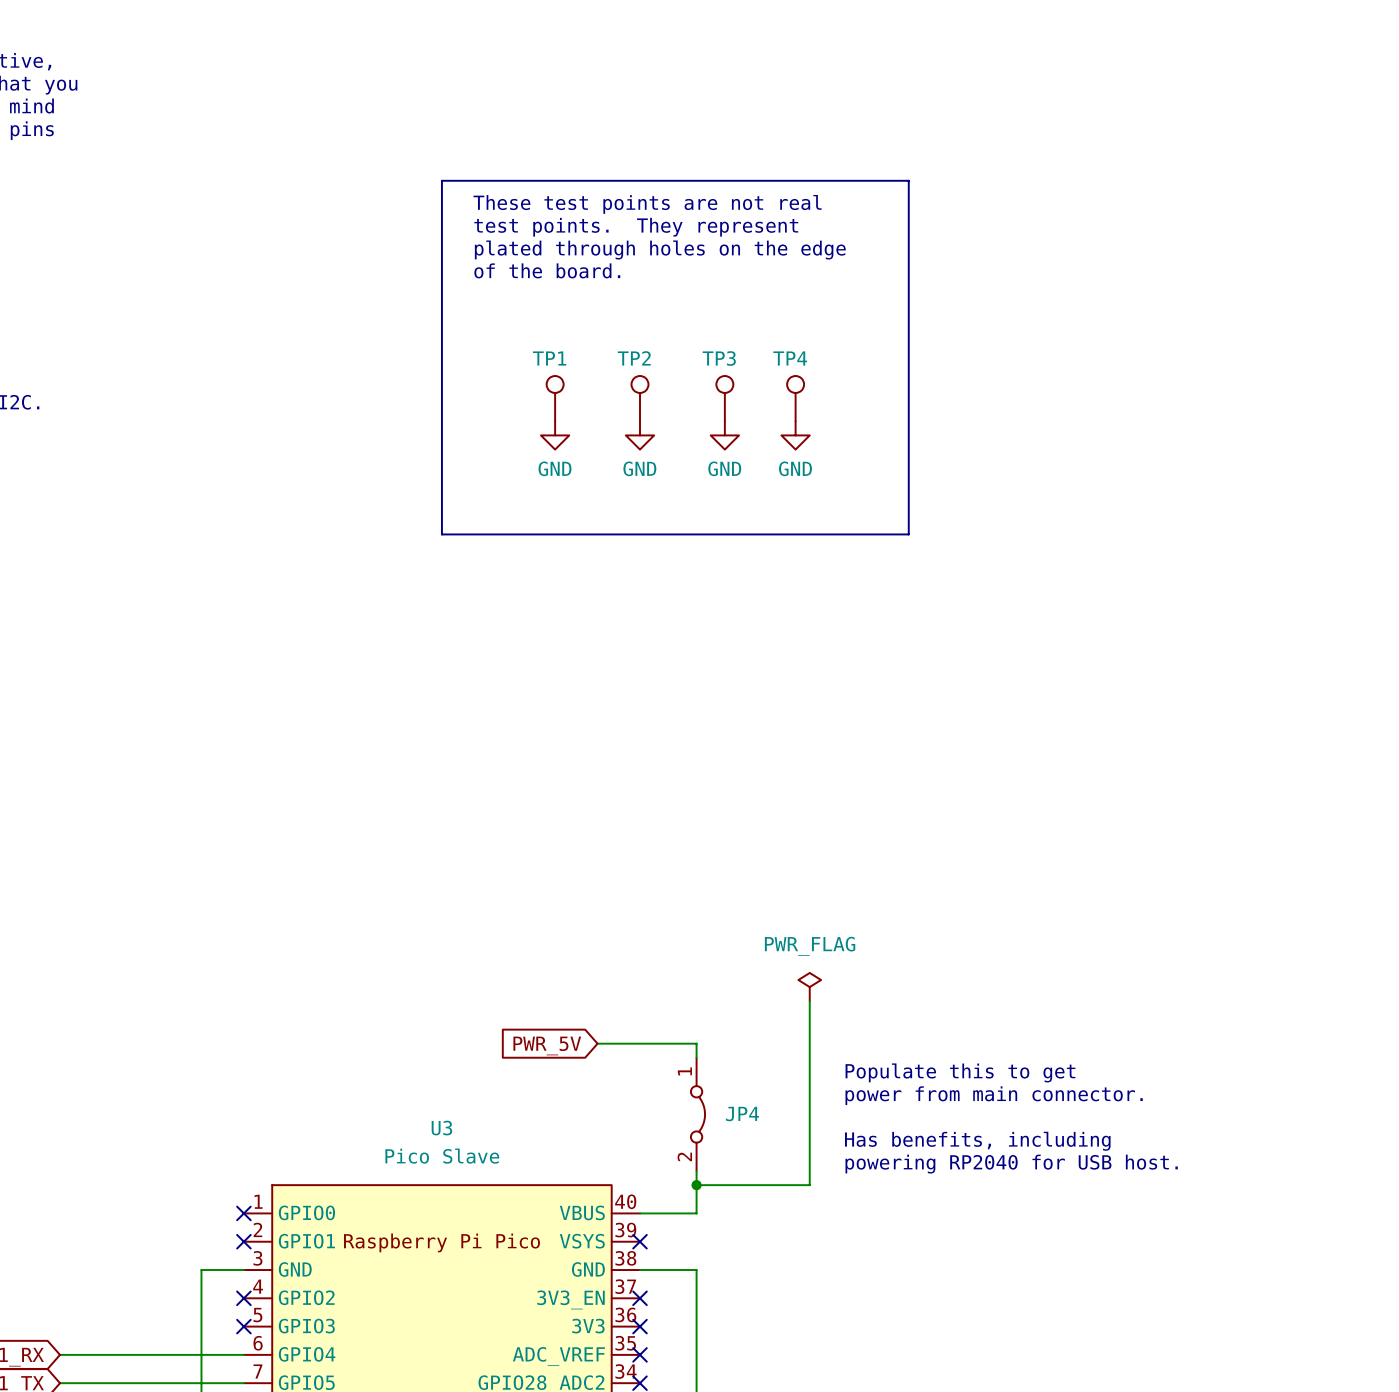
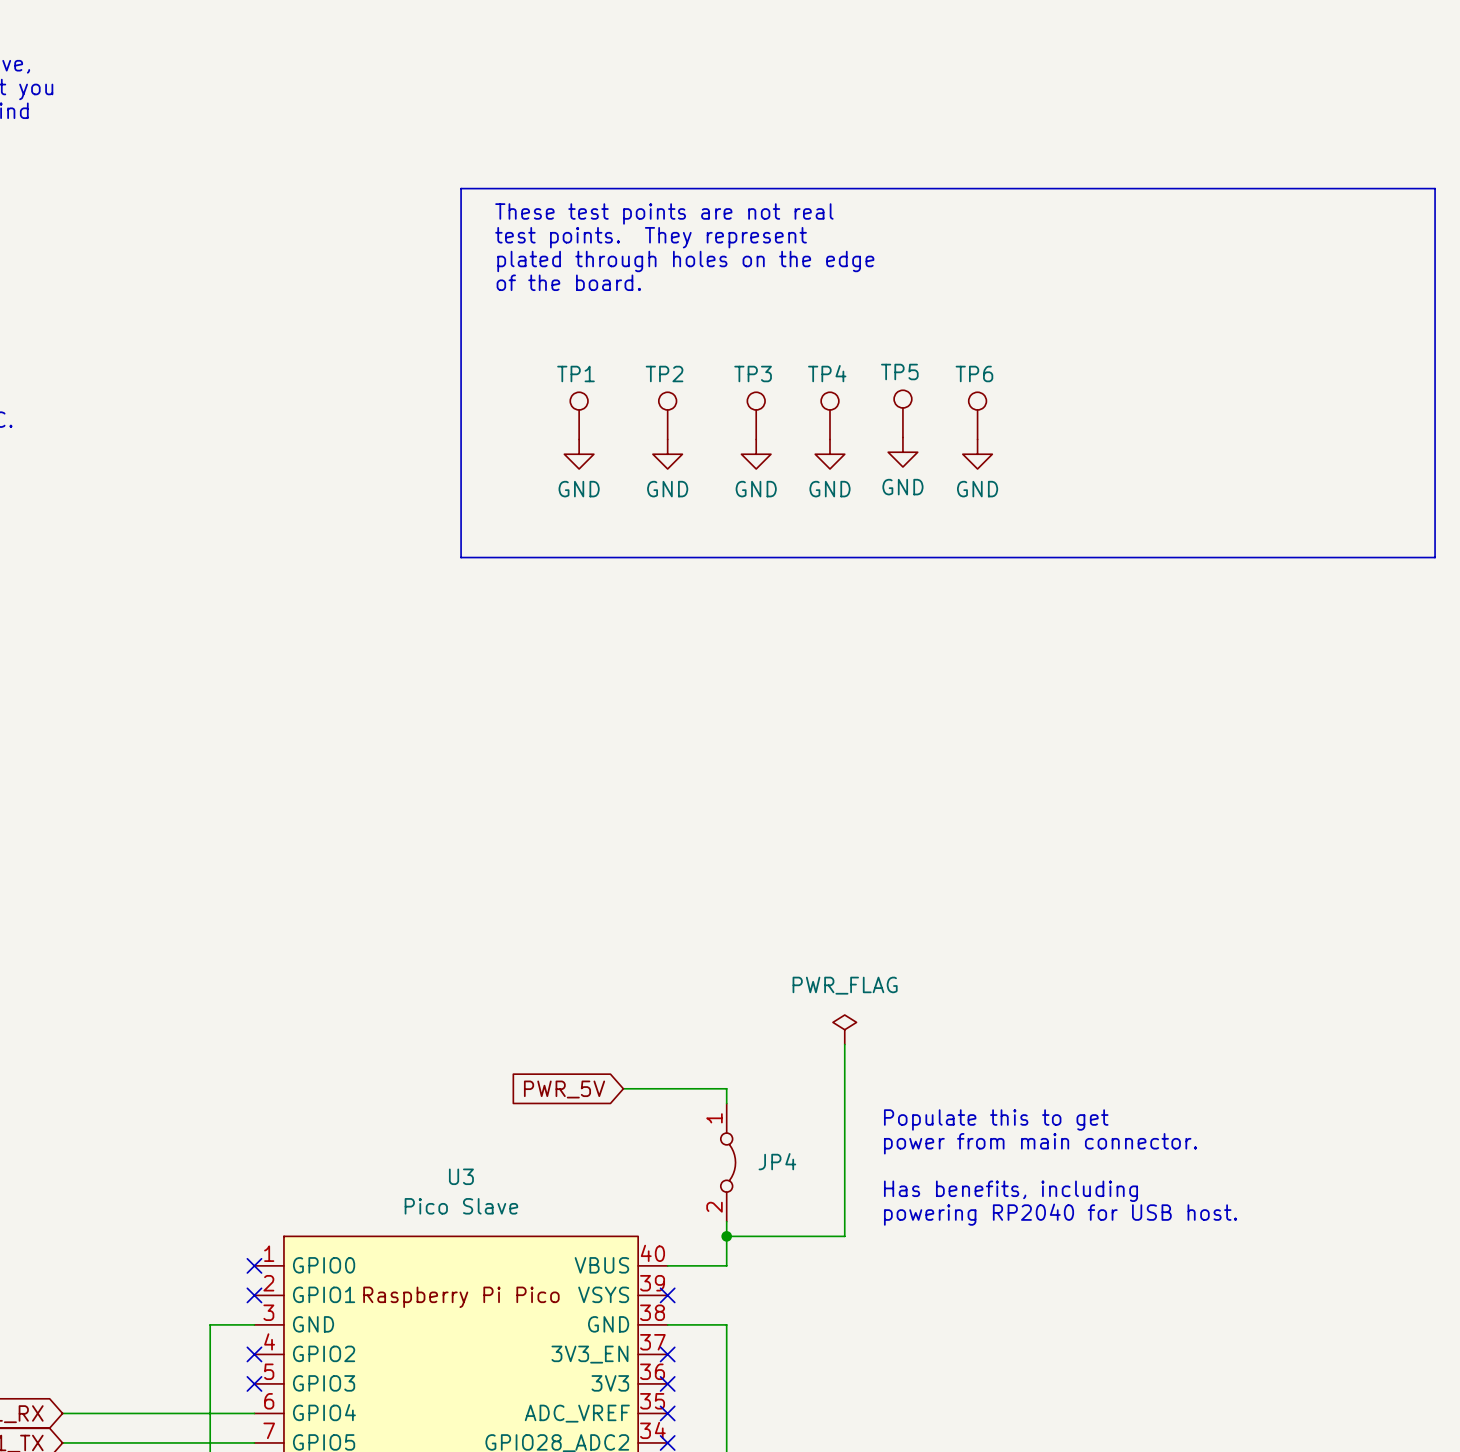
line: (908, 180) (908, 534) -> (948, 188) (1435, 188) (1435, 557) (948, 557)
TP5: none -> (902, 413)
TP6: none -> (977, 415)
power symbol: none -> GND (902, 452)
power symbol: none -> GND (977, 454)

